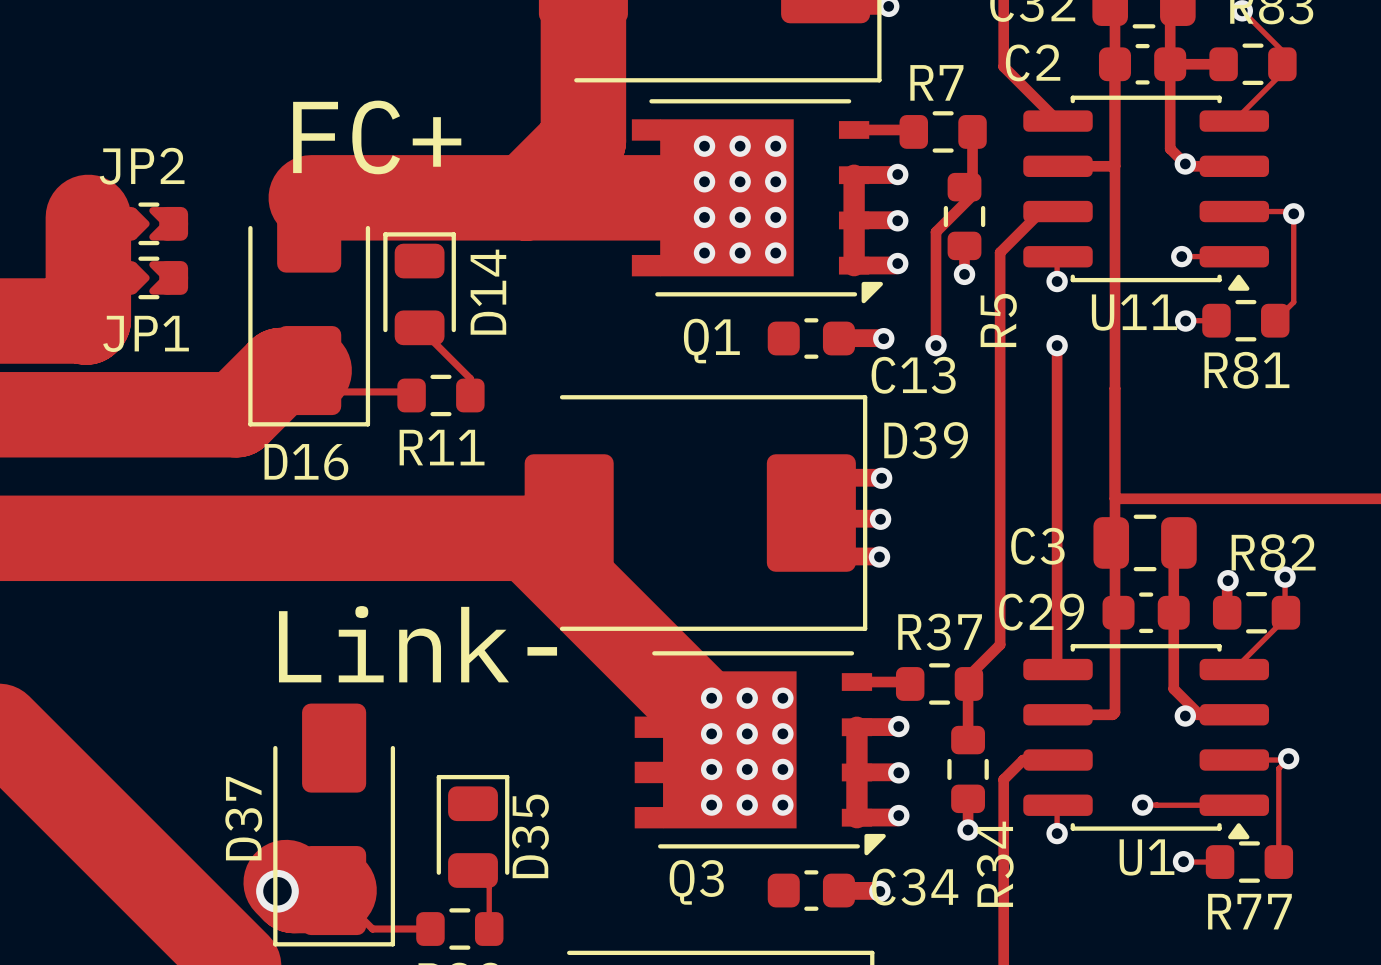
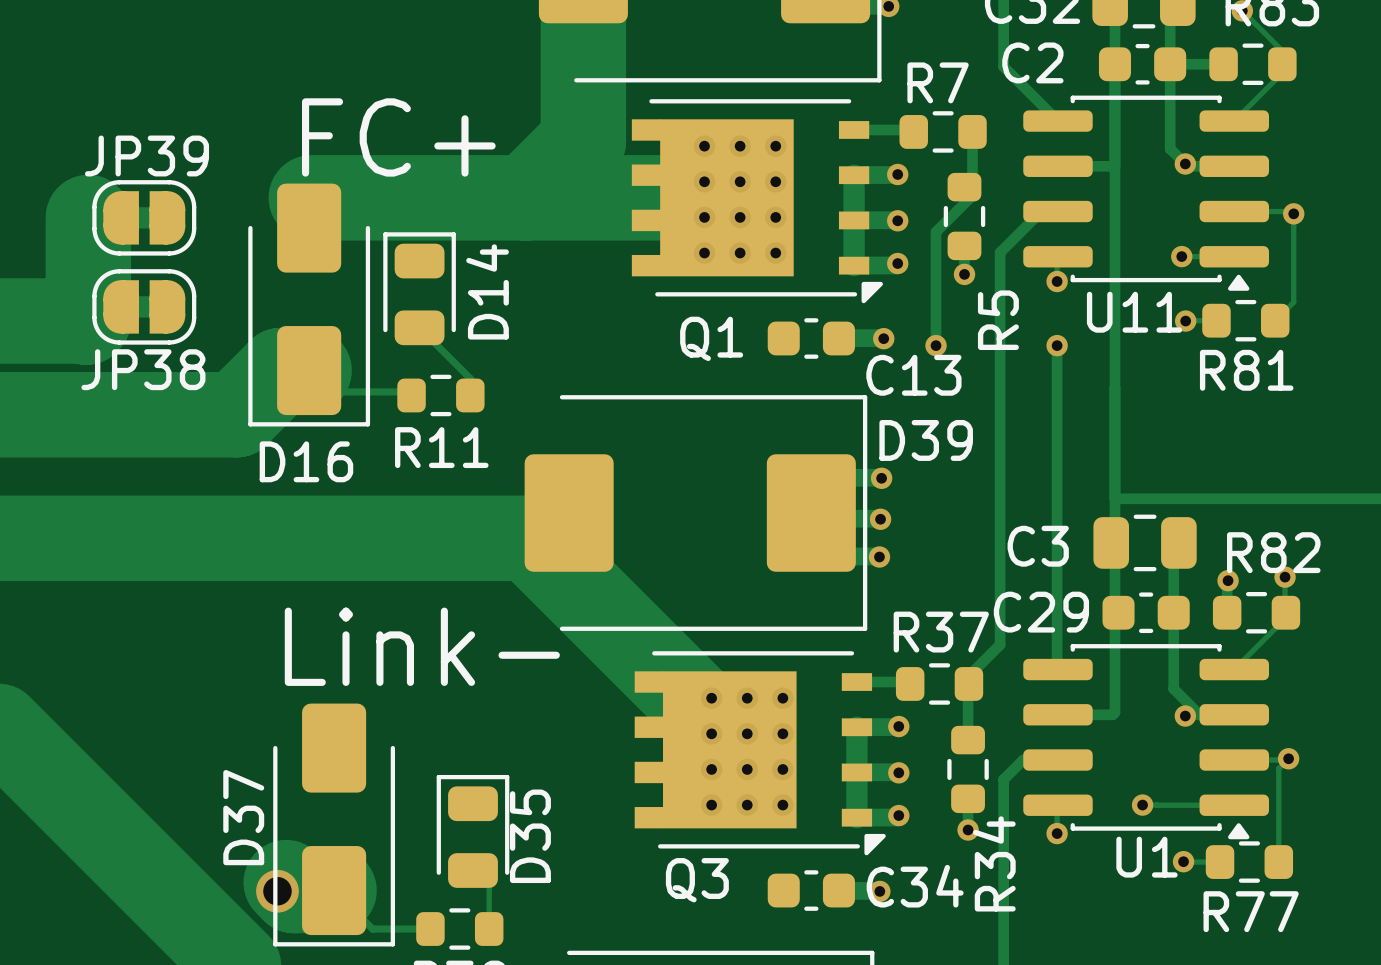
JP39: none -> (144, 217)
JP2: (148, 223) -> none
JP1: (148, 277) -> none
JP38: none -> (144, 306)

